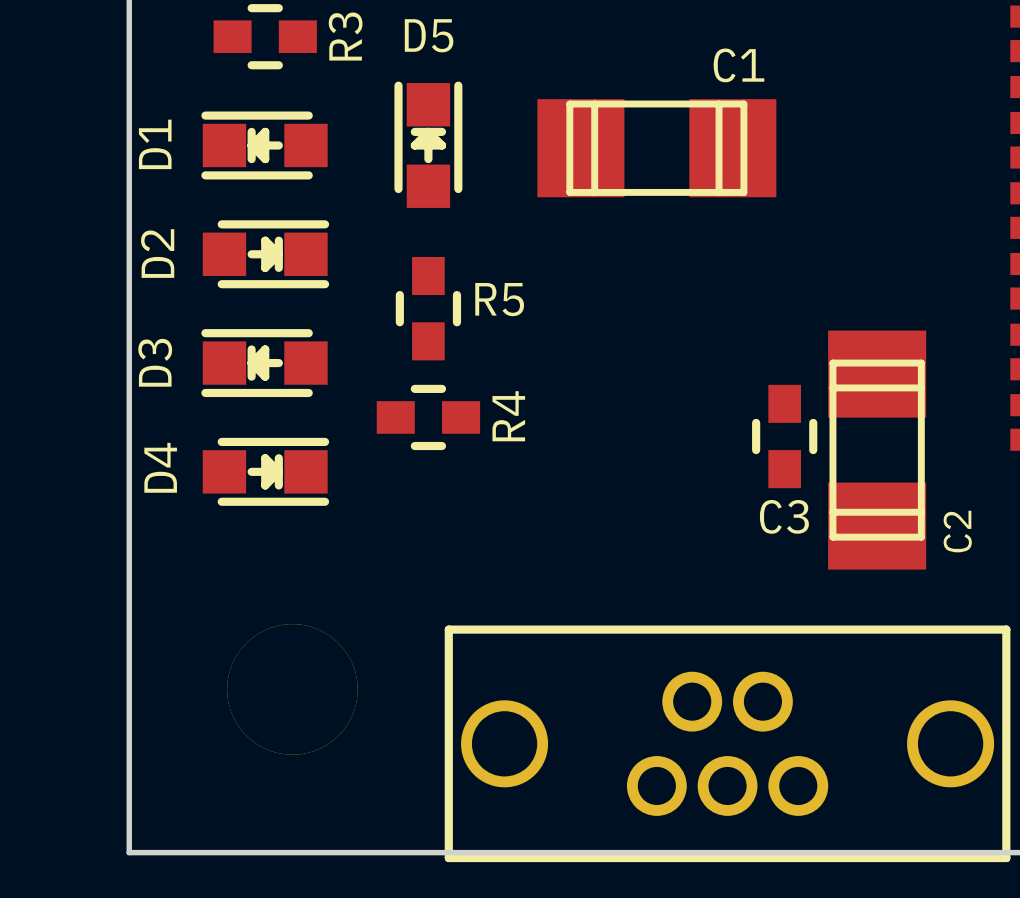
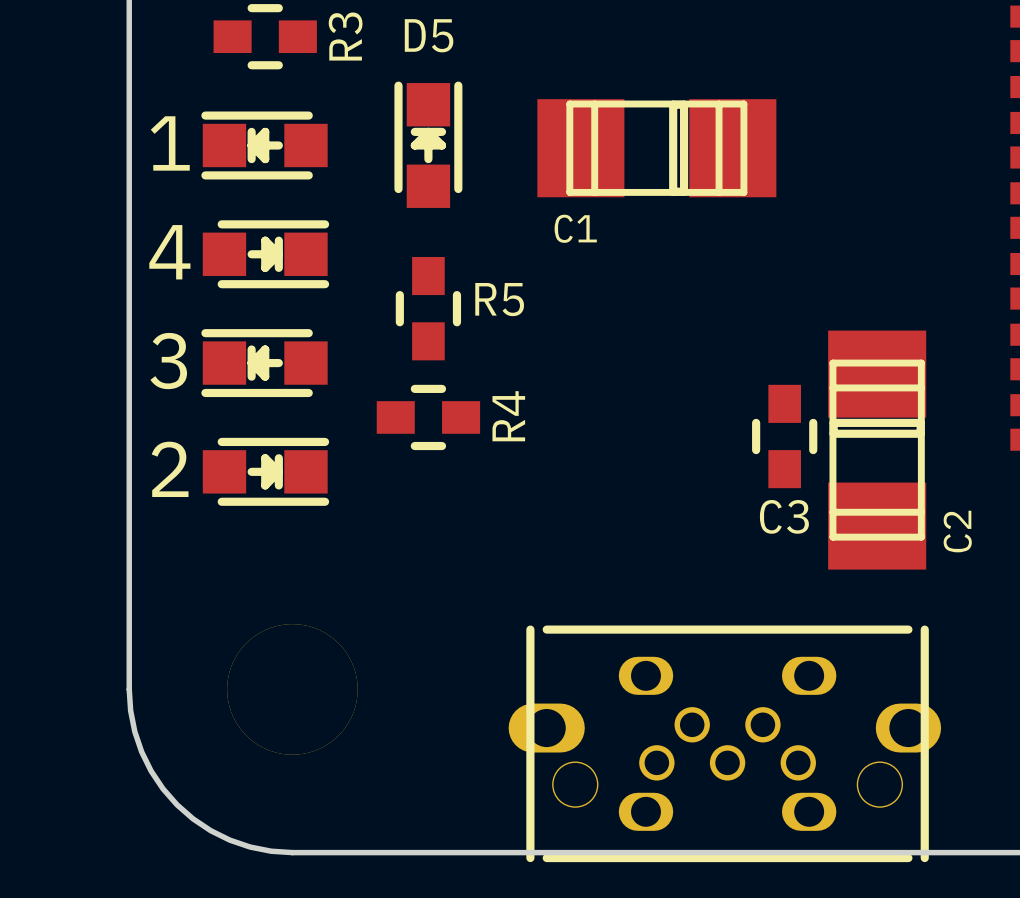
C1 name position: C1 (738, 65) -> C1 (575, 228)
C1 footprint: [537, 99, 777, 198] -> [537, 99, 777, 198]
text: none -> 1 (170, 143)
D1 name: D1 (155, 144) -> none
text: none -> 4 (169, 252)
D2 name: D2 (157, 253) -> none
C2 footprint: [828, 330, 927, 570] -> [828, 330, 927, 570]
text: none -> 3 (168, 361)
D3 name: D3 (155, 362) -> none
D4 name: D4 (160, 467) -> none
text: none -> 2 (170, 469)
part footprint: [444, 625, 1011, 863] -> [508, 625, 942, 863]
board edge: (129, 689) (129, 852) (292, 852) -> (129, 689) (130, 710) (141, 751) (151, 771) (177, 804) (210, 830) (229, 840) (271, 851) (292, 852)

